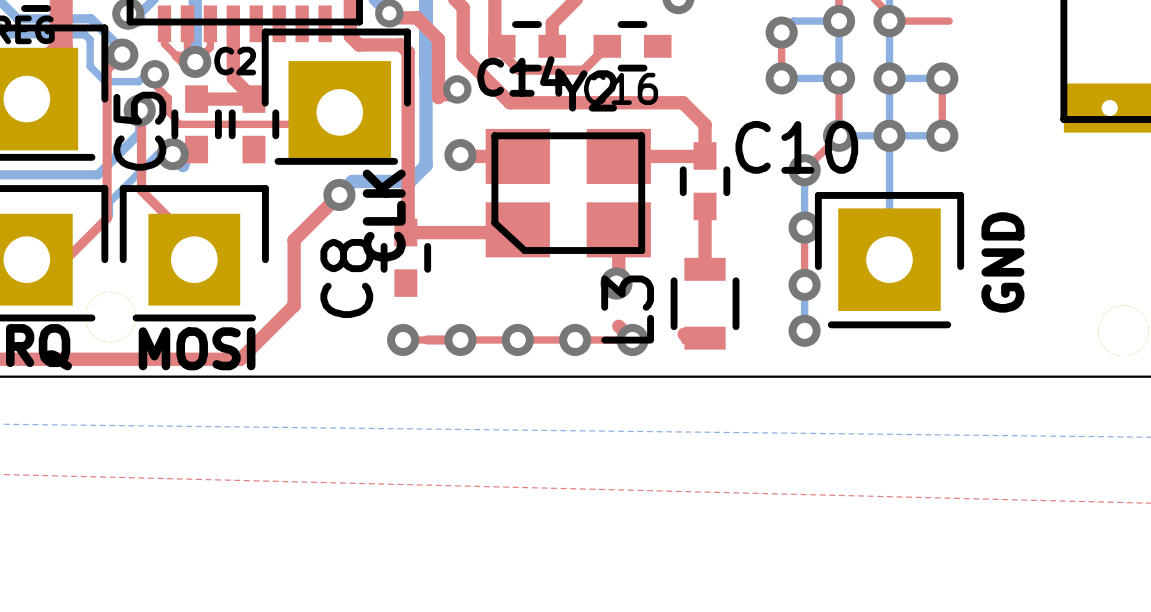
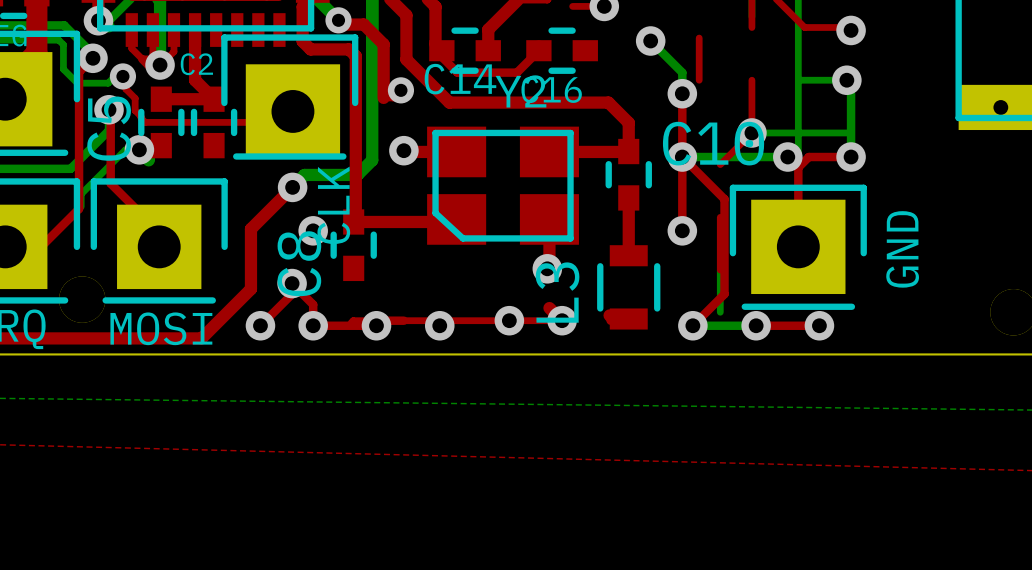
via: (839, 21) -> none
via: (889, 21) -> none
via: none -> (851, 30)
bottom track: (781, 32) (793, 21) (839, 21) (839, 78) (781, 78) -> none
via: (781, 32) -> none
bottom track: none -> (650, 41) (682, 72) (682, 93)
via: none -> (650, 41)
via position: (781, 78) -> (682, 93)
via: (839, 78) -> none
via: (889, 78) -> none
top track: (942, 78) (942, 135) -> none
top track: none -> (682, 93) (682, 230)
bottom track: none -> (851, 93) (851, 157)
via position: (889, 135) -> (787, 157)
via position: (942, 135) -> (851, 157)
top track: none -> (682, 157) (724, 199) (724, 294) (692, 325)
bottom track: none -> (682, 157) (787, 157)
via: none -> (682, 157)
top track: none -> (851, 157) (808, 157) (798, 167) (798, 246)
bottom track: (804, 170) (804, 227) -> none
via: (804, 170) -> none
via: (804, 227) -> none
via: none -> (313, 230)
via: none -> (682, 230)
via: (804, 284) -> none
via: none -> (292, 283)
via position: (804, 330) -> (692, 325)
via: (403, 339) -> none
via: (460, 339) -> none
via position: (517, 339) -> (439, 325)
top track: none -> (260, 325) (292, 294) (292, 283) (313, 304) (313, 325) (376, 325)
via: none -> (260, 325)
via: none -> (313, 325)
via: none -> (376, 325)
bottom track: none -> (692, 325) (756, 325)
top track: none -> (756, 325) (819, 325)
via: none -> (756, 325)
via: none -> (819, 325)

